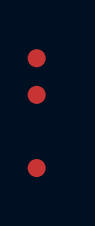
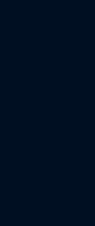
part: (36, 58) -> none
part: (36, 94) -> none
part: (36, 168) -> none

